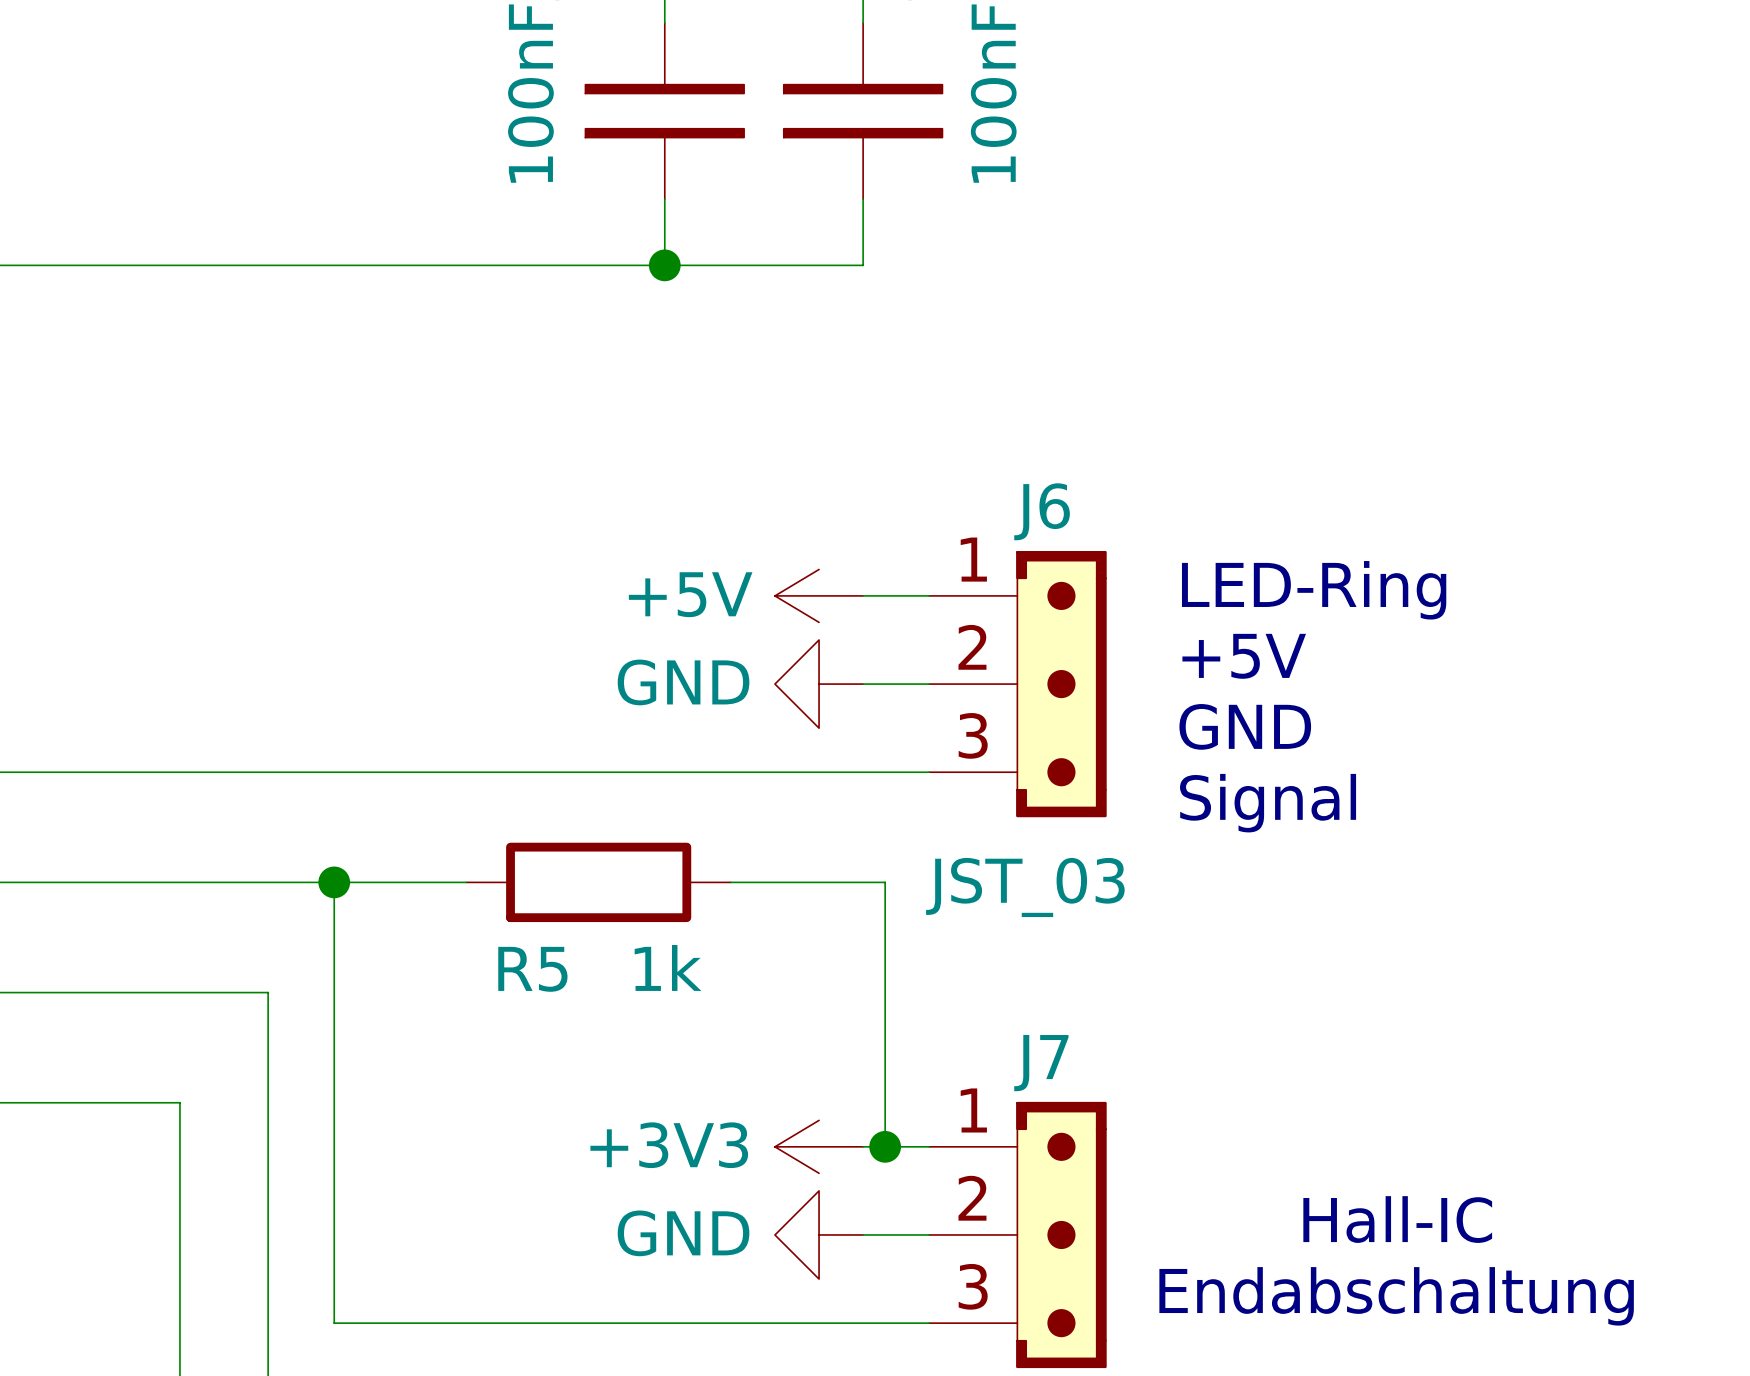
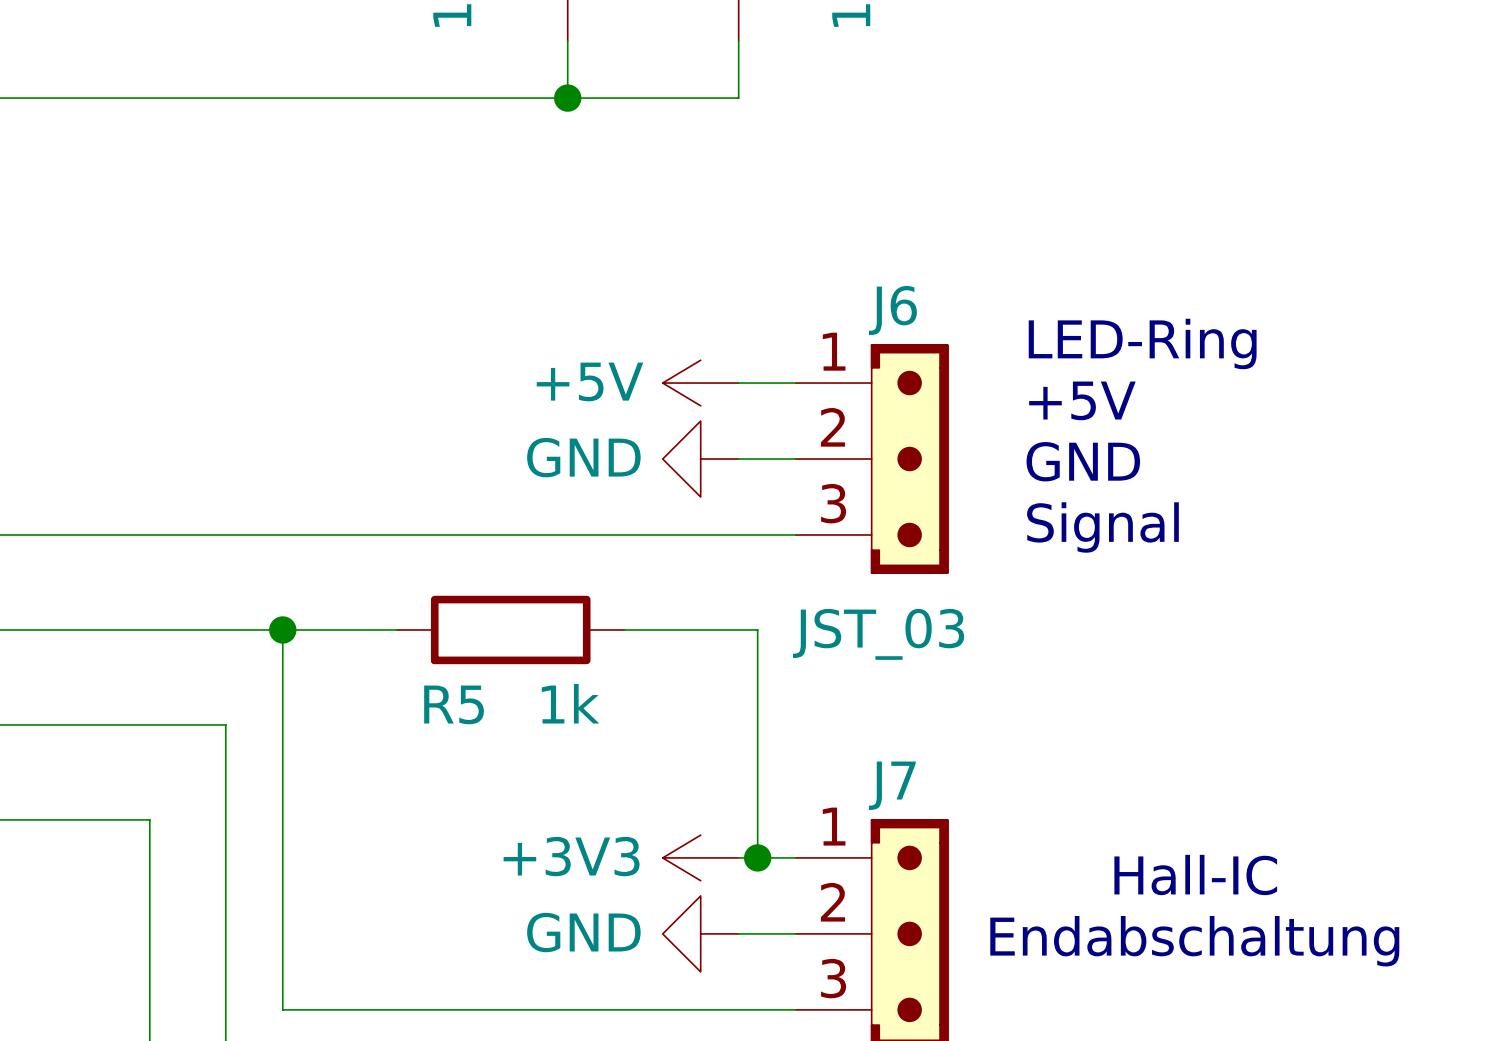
text position: LED-Ring (1314, 590) -> LED-Ring (1142, 343)
text position: +5V (1244, 656) -> +5V (1082, 400)
text position: GND (1245, 726) -> GND (1083, 461)
text position: Signal (1268, 803) -> Signal (1102, 527)
text position: Hall-IC (1397, 1219) -> Hall-IC (1195, 875)
text position: Endabschaltung (1396, 1296) -> Endabschaltung (1194, 941)

